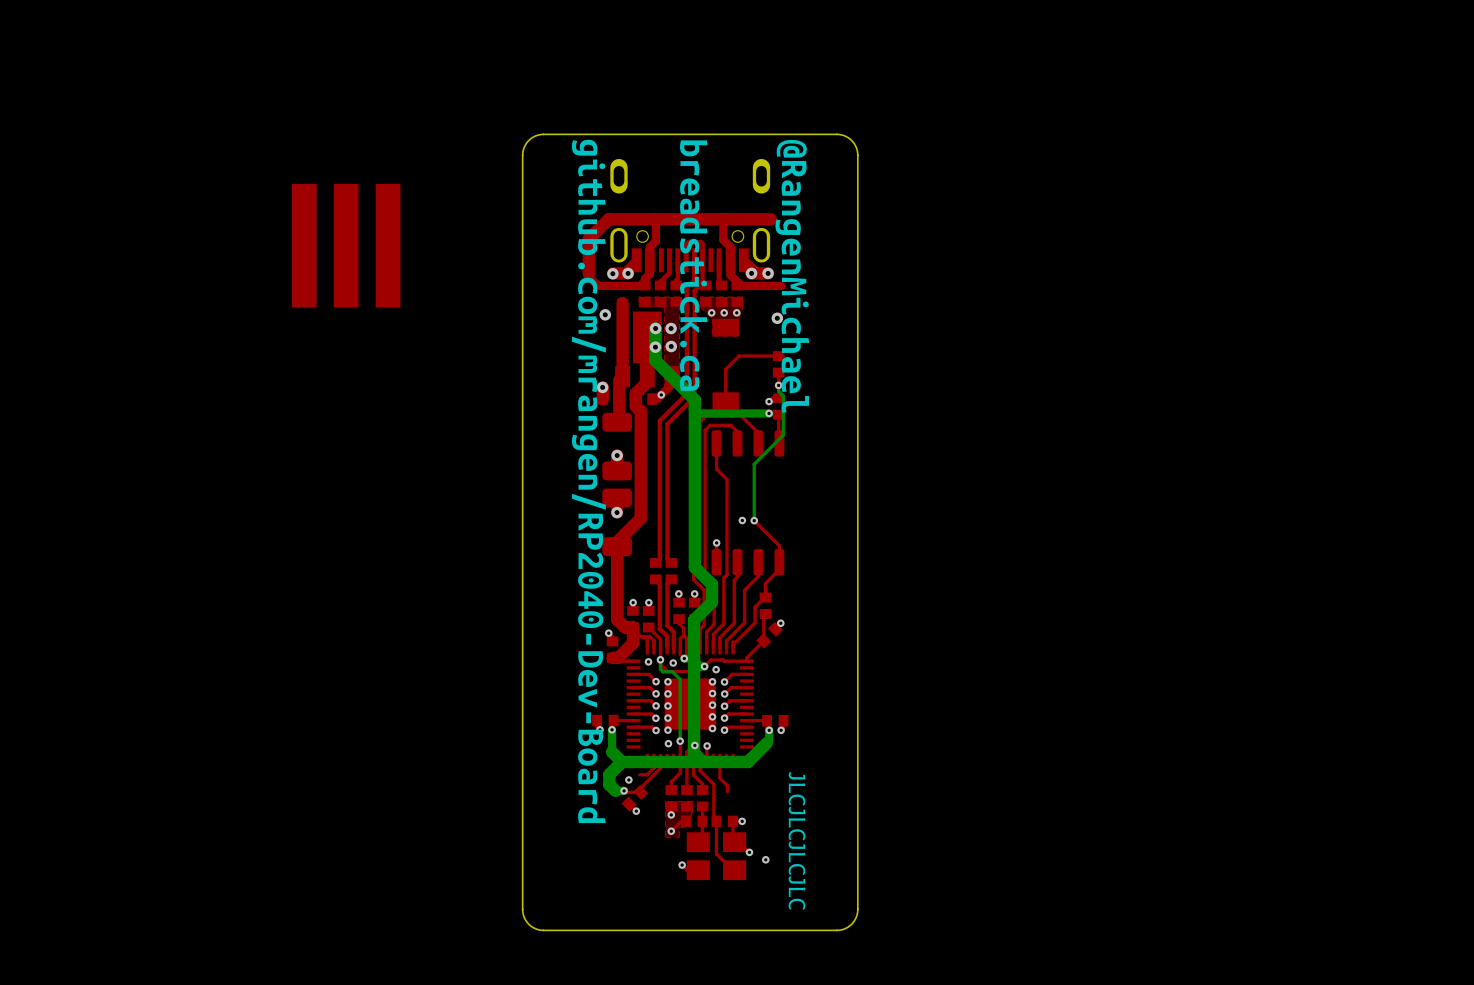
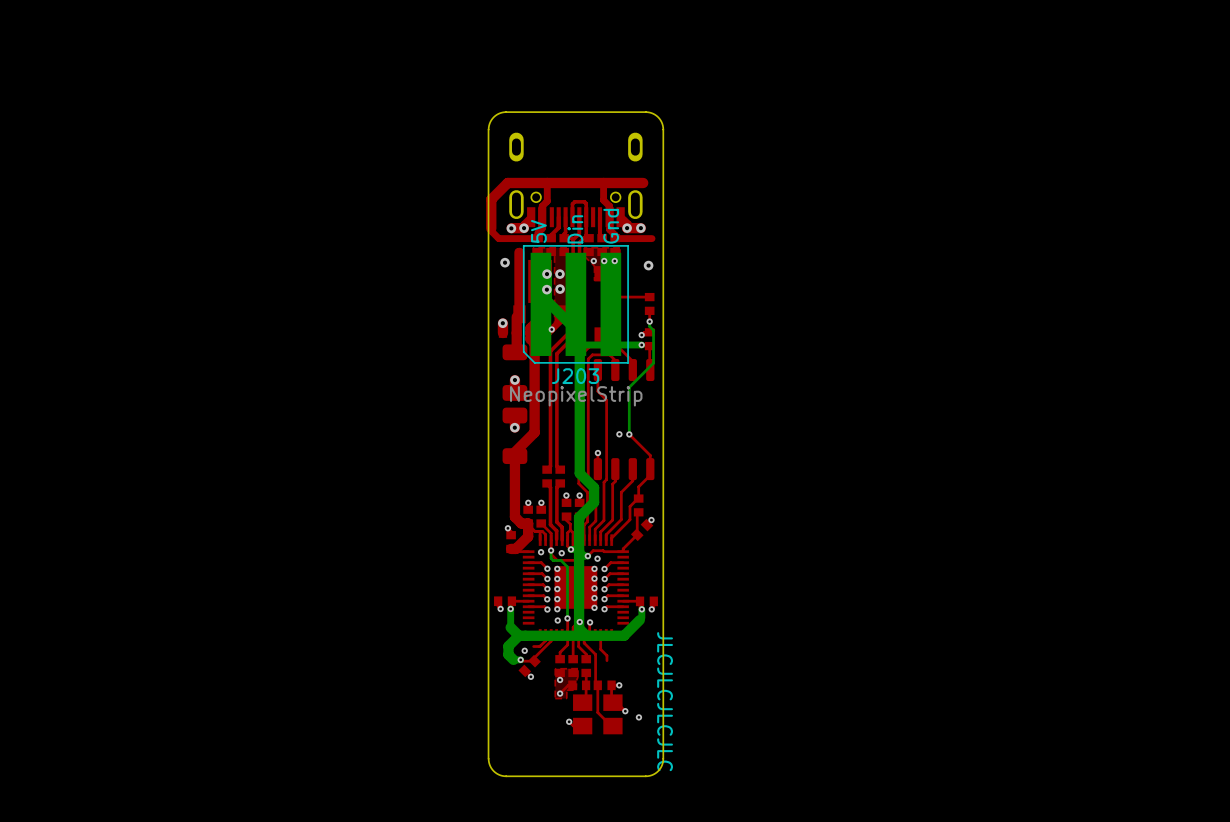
board edge: (606, 134) (538, 134) (527, 142) (522, 155) (522, 911) (528, 924) (538, 929) (606, 930) -> (506, 112) (493, 117) (488, 129)
board edge: (774, 134) (841, 134) (853, 142) (857, 155) (857, 911) (853, 922) (841, 929) (774, 930) -> (645, 112) (658, 117) (663, 129) (663, 758) (658, 771) (645, 776)
drawing: [571, 139, 606, 824] -> none
drawing: [775, 139, 810, 413] -> none
drawing: [680, 140, 708, 391] -> none
board edge: none -> (488, 129) (488, 758)
J203 side: top (346, 245) -> bottom (575, 304)
board edge: none -> (488, 758) (493, 771) (506, 776)

